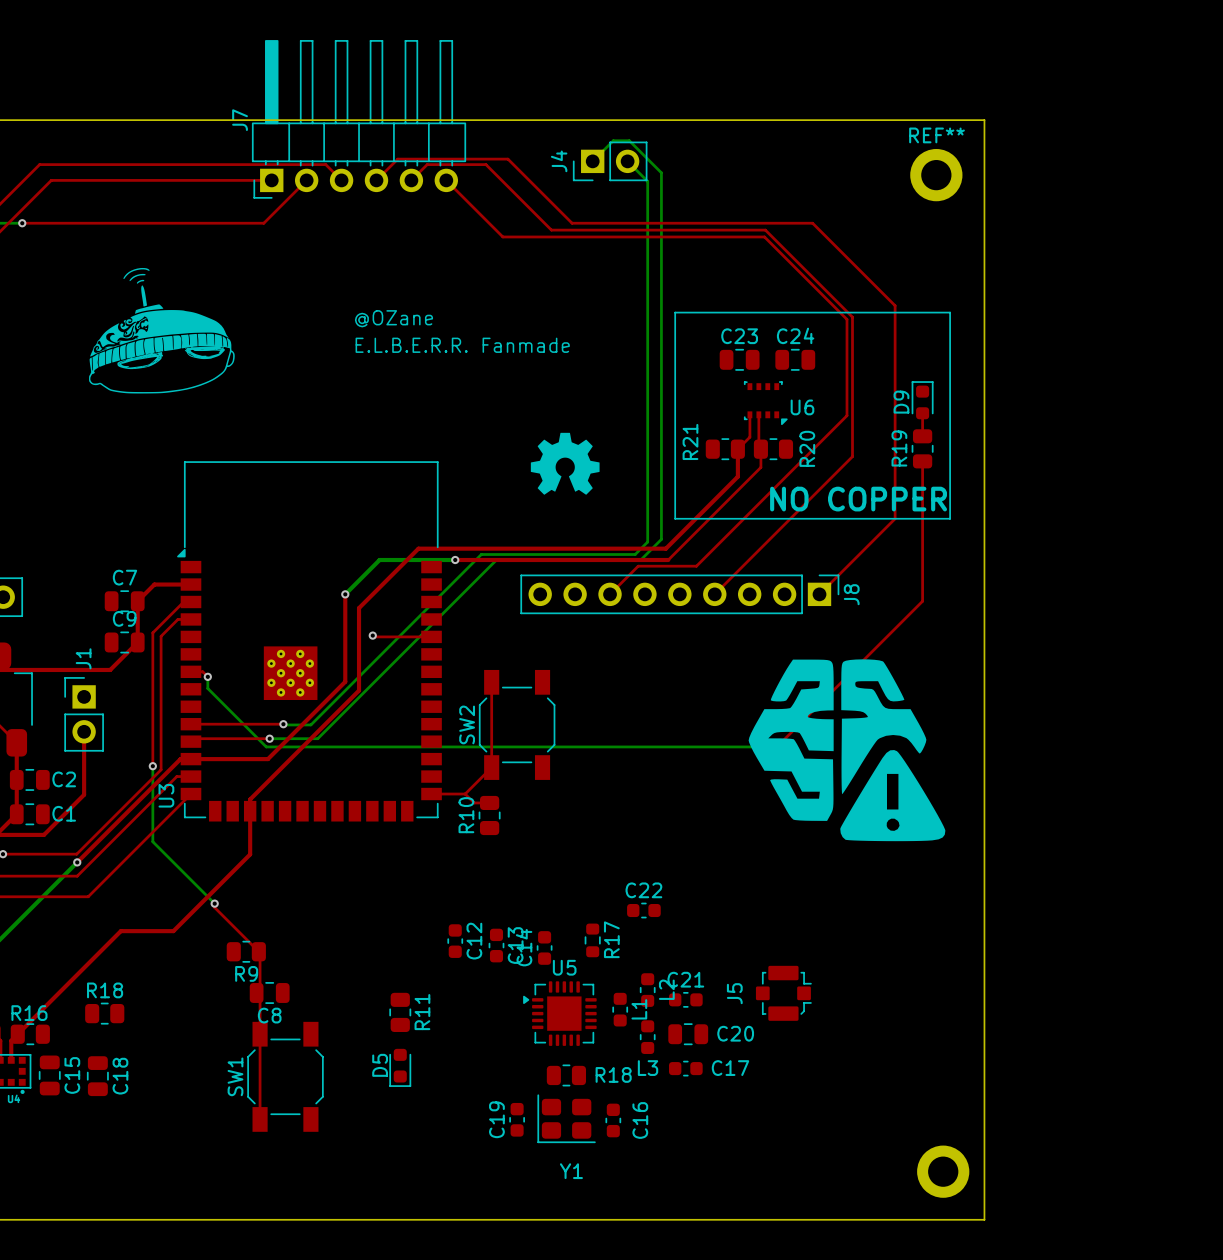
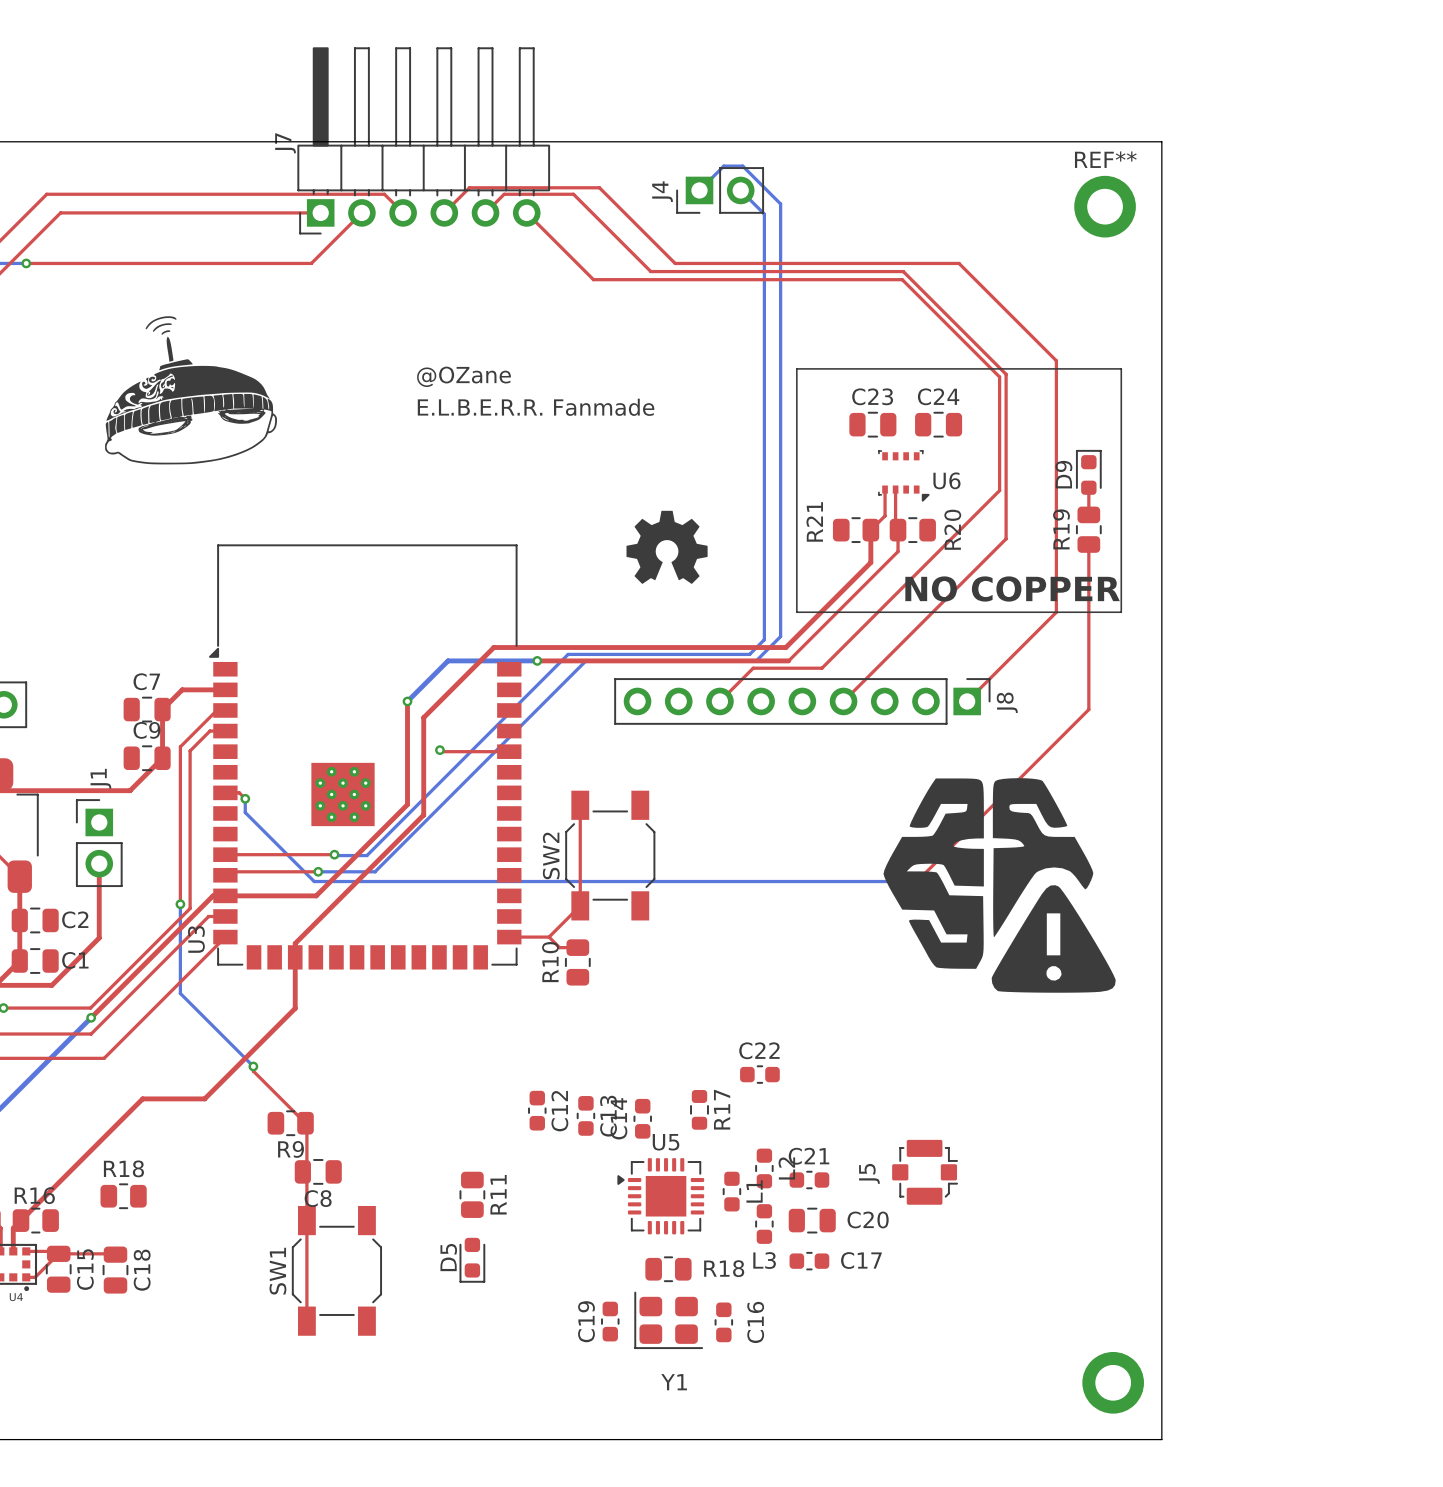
top track: none -> (26, 1251) (56, 1251) (58, 1253)
top track: none -> (58, 1253) (35, 1277) (26, 1277)
top track: none -> (58, 1253) (115, 1254)

